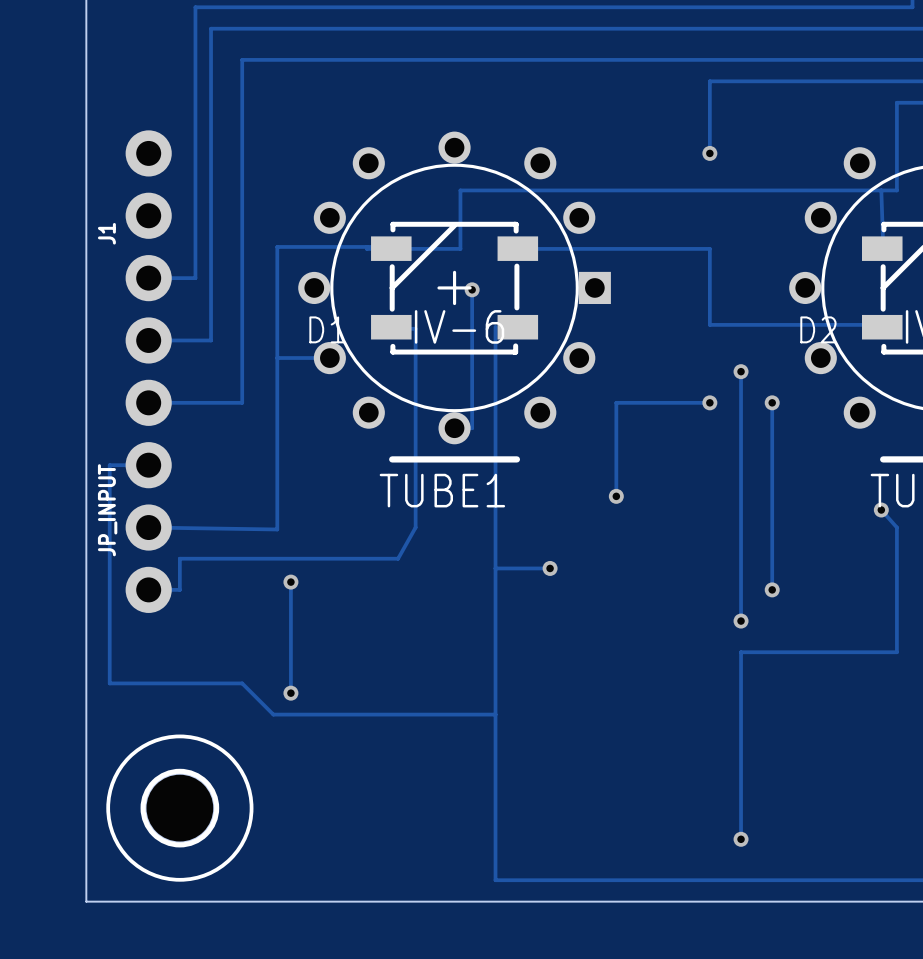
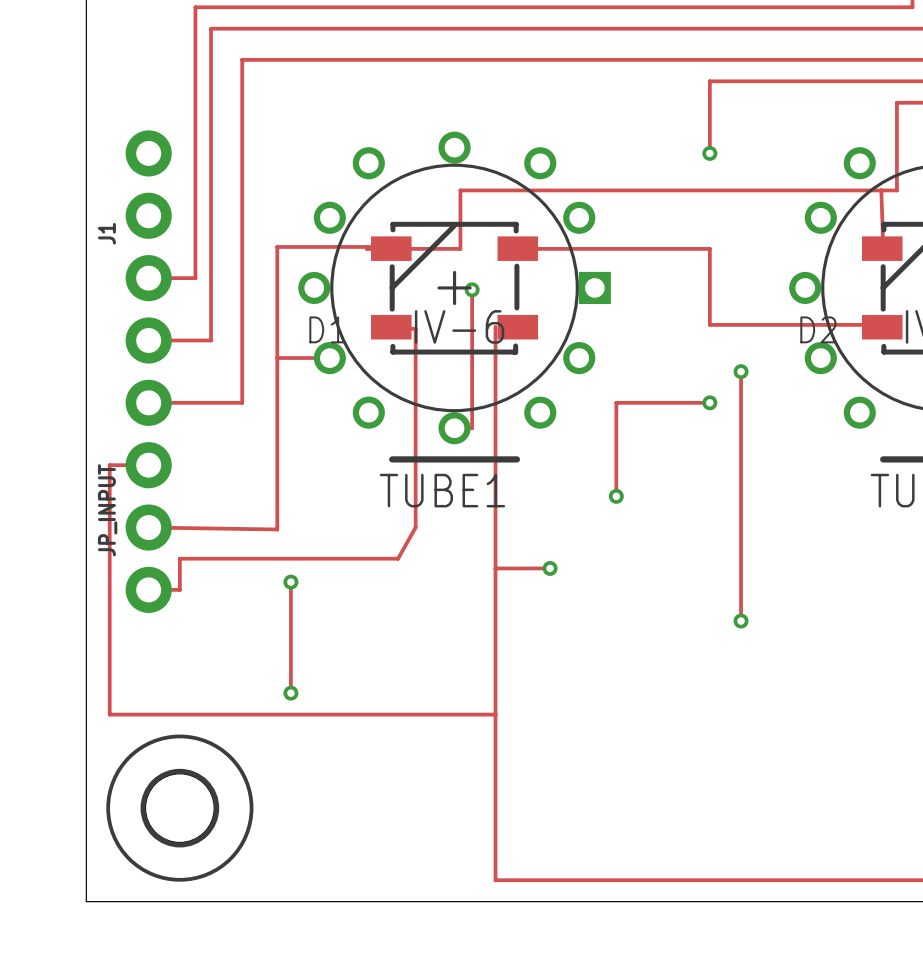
track: (772, 402) (772, 589) -> none
via: (772, 402) -> none
track: (881, 510) (896, 527) (896, 652) (741, 652) (741, 839) -> none
via: (881, 510) -> none
via: (772, 589) -> none
track: (109, 683) (242, 683) (273, 714) -> (109, 683) (109, 714) (273, 714)
via: (741, 839) -> none

